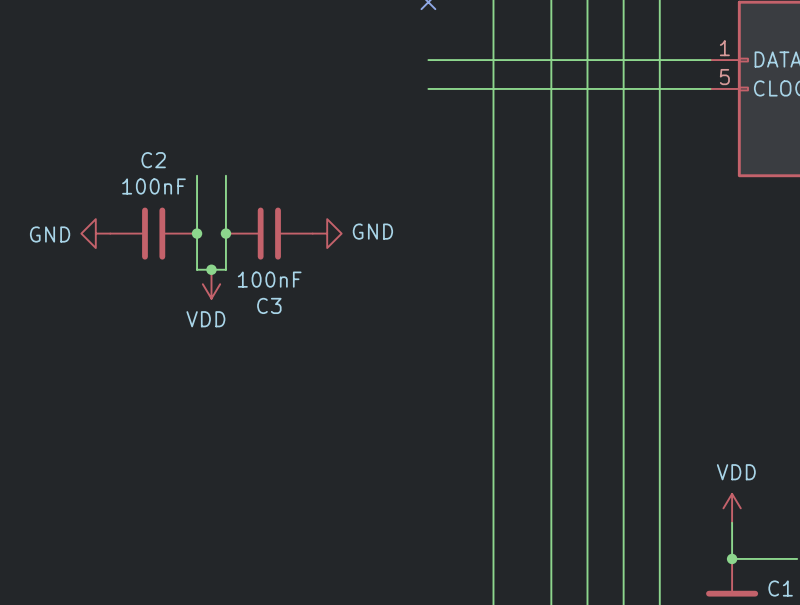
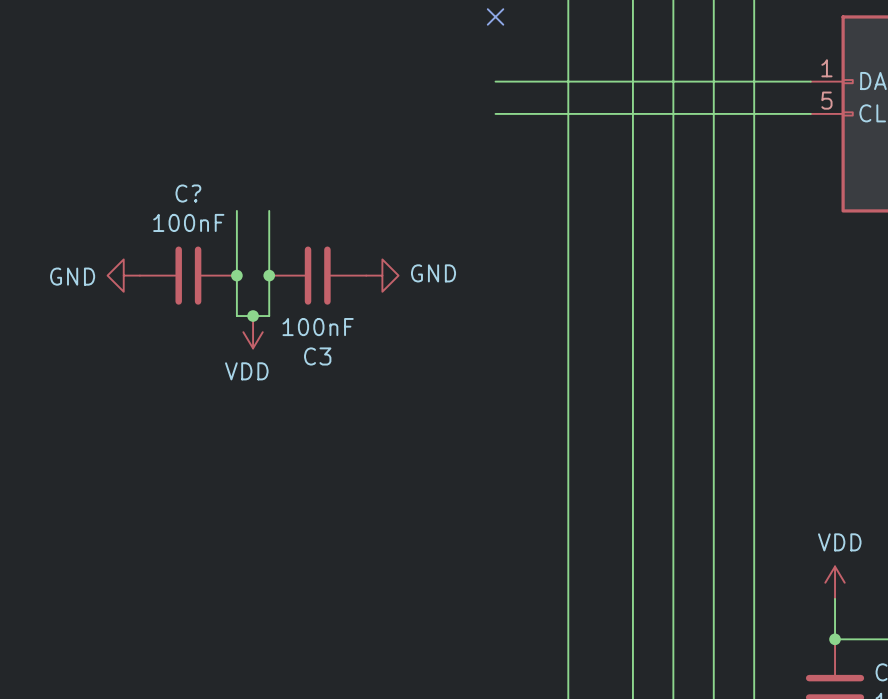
C2 name: C2 (153, 160) -> C? (188, 193)

